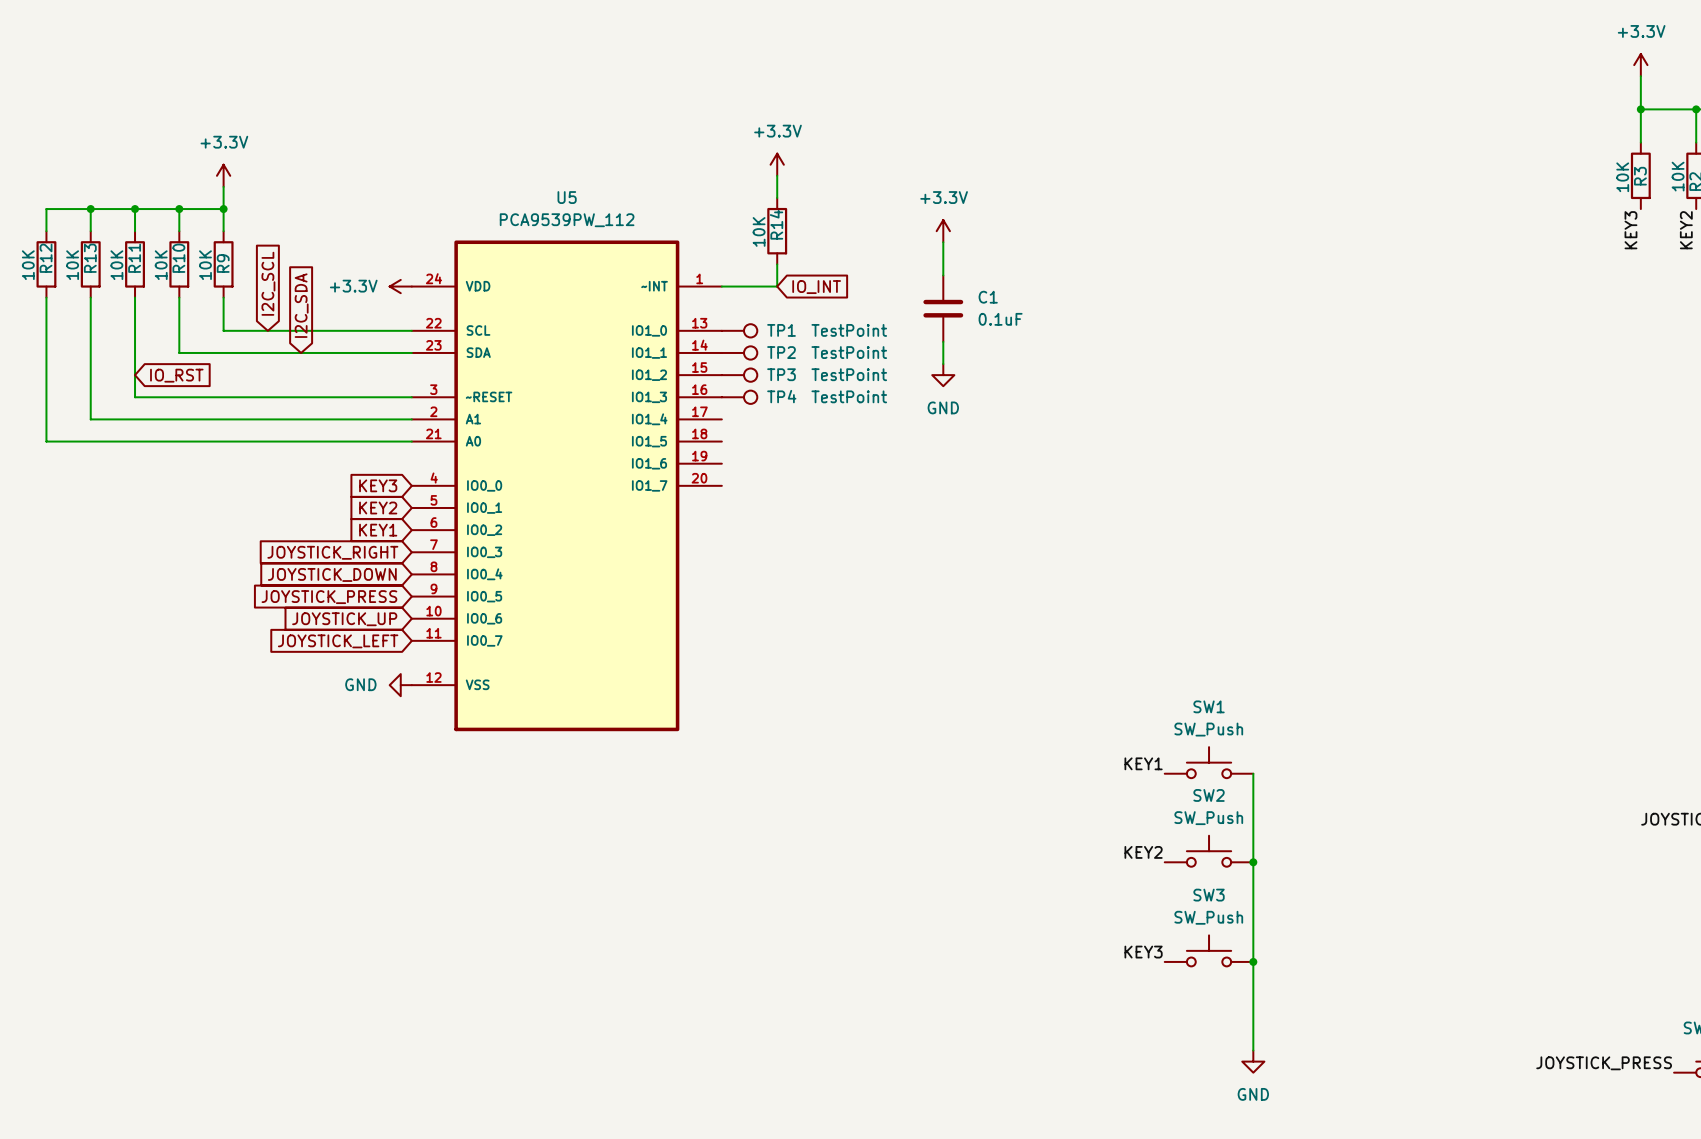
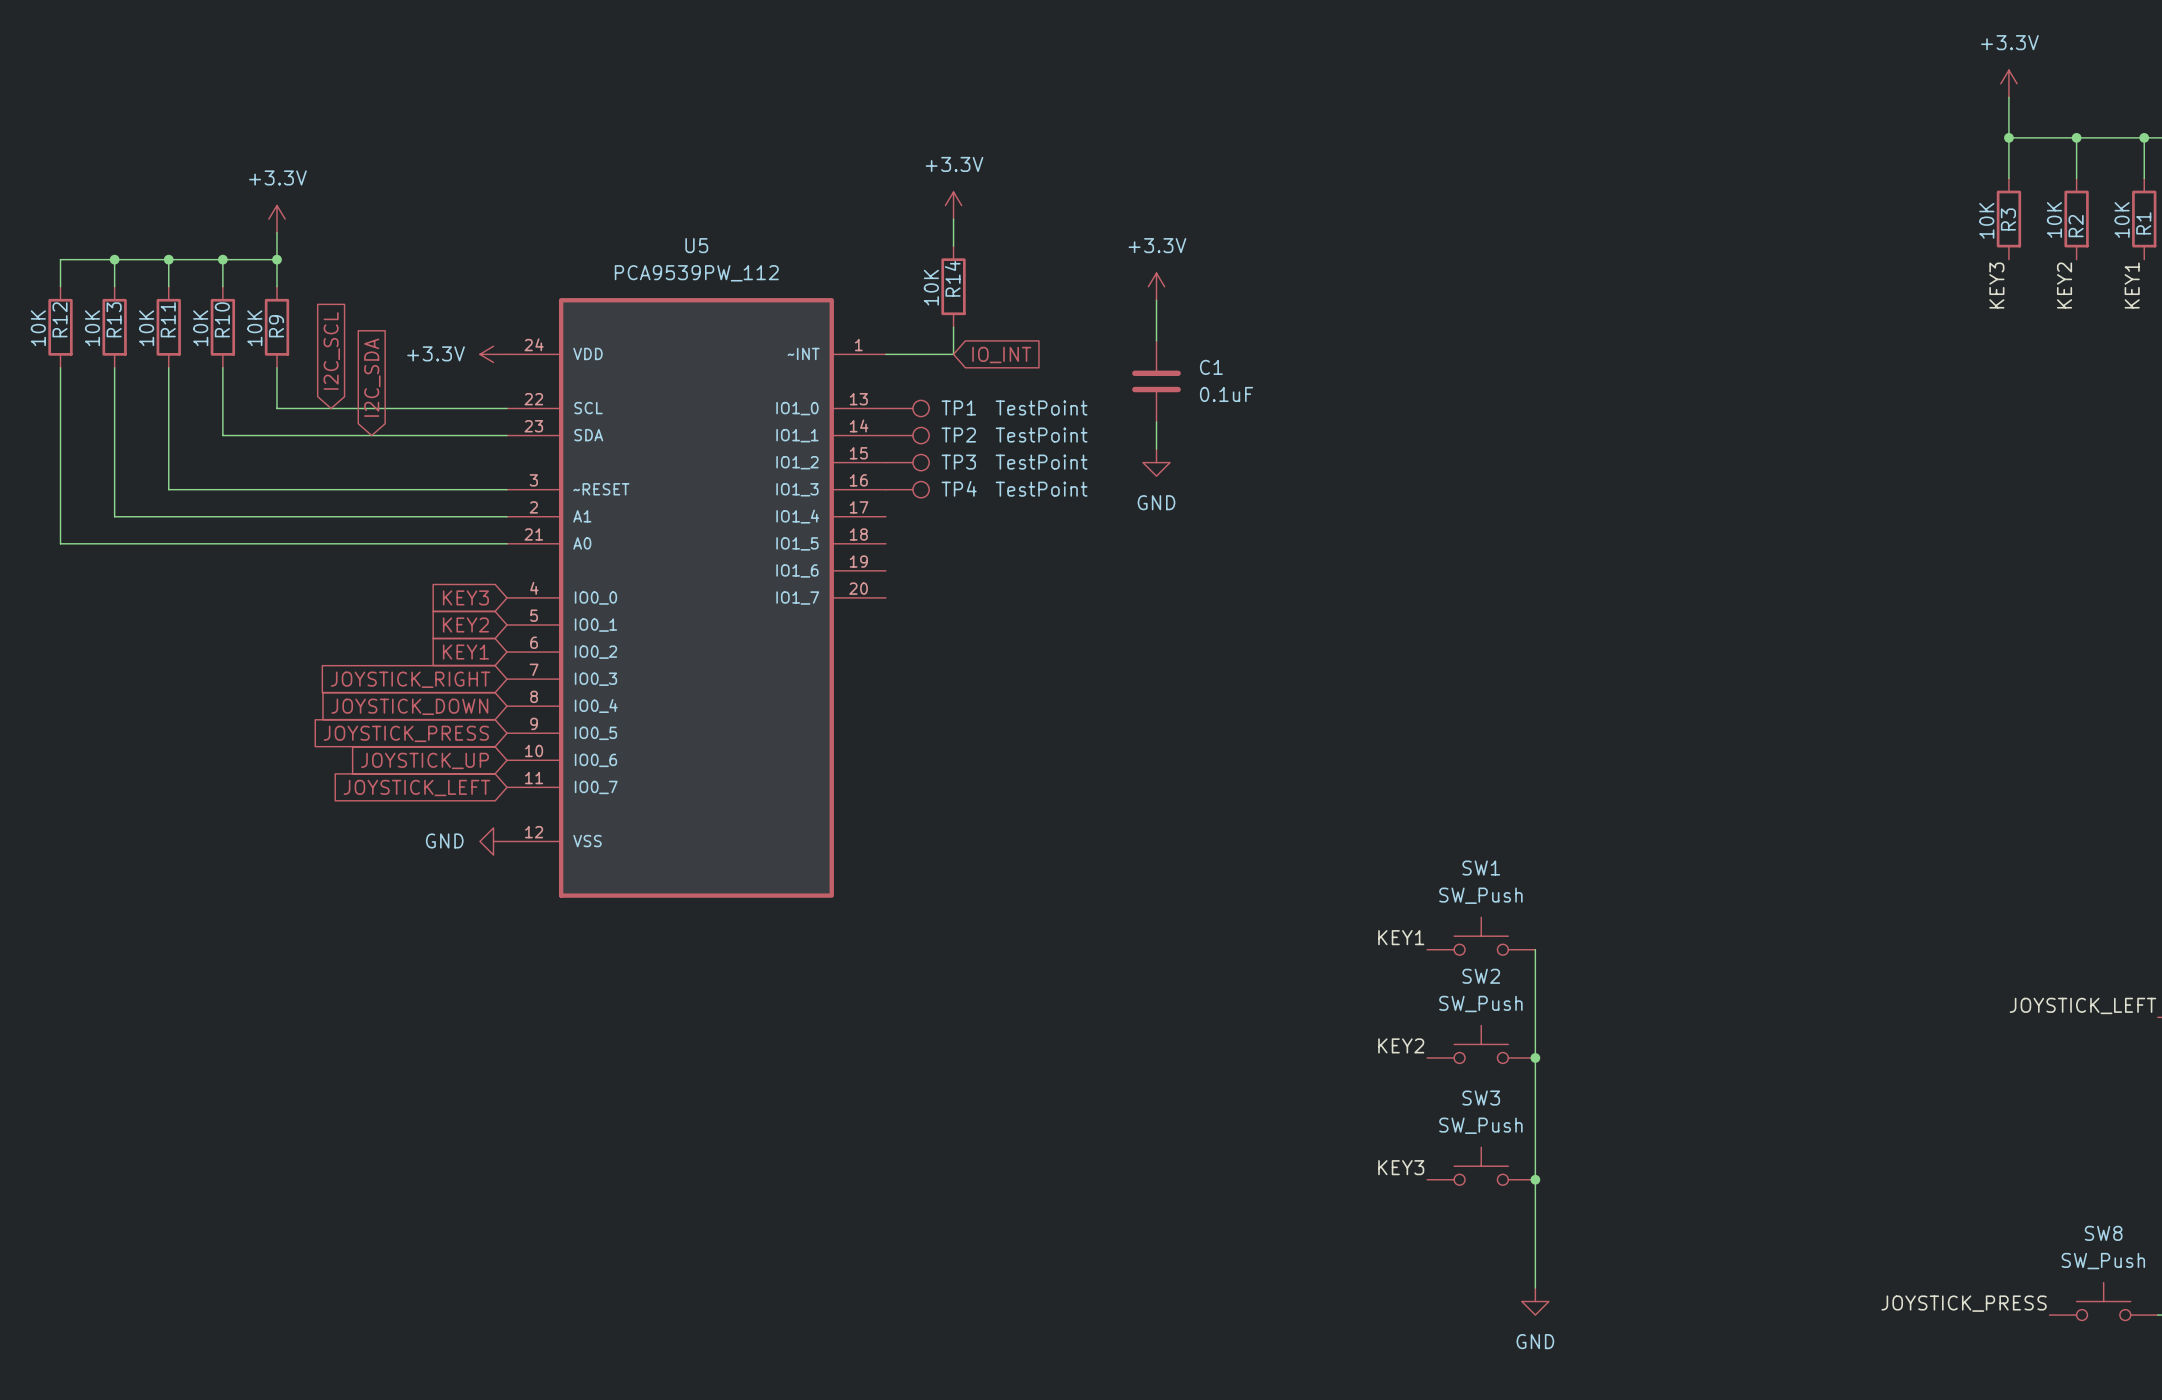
global label: IO_RST (176, 375) -> none

